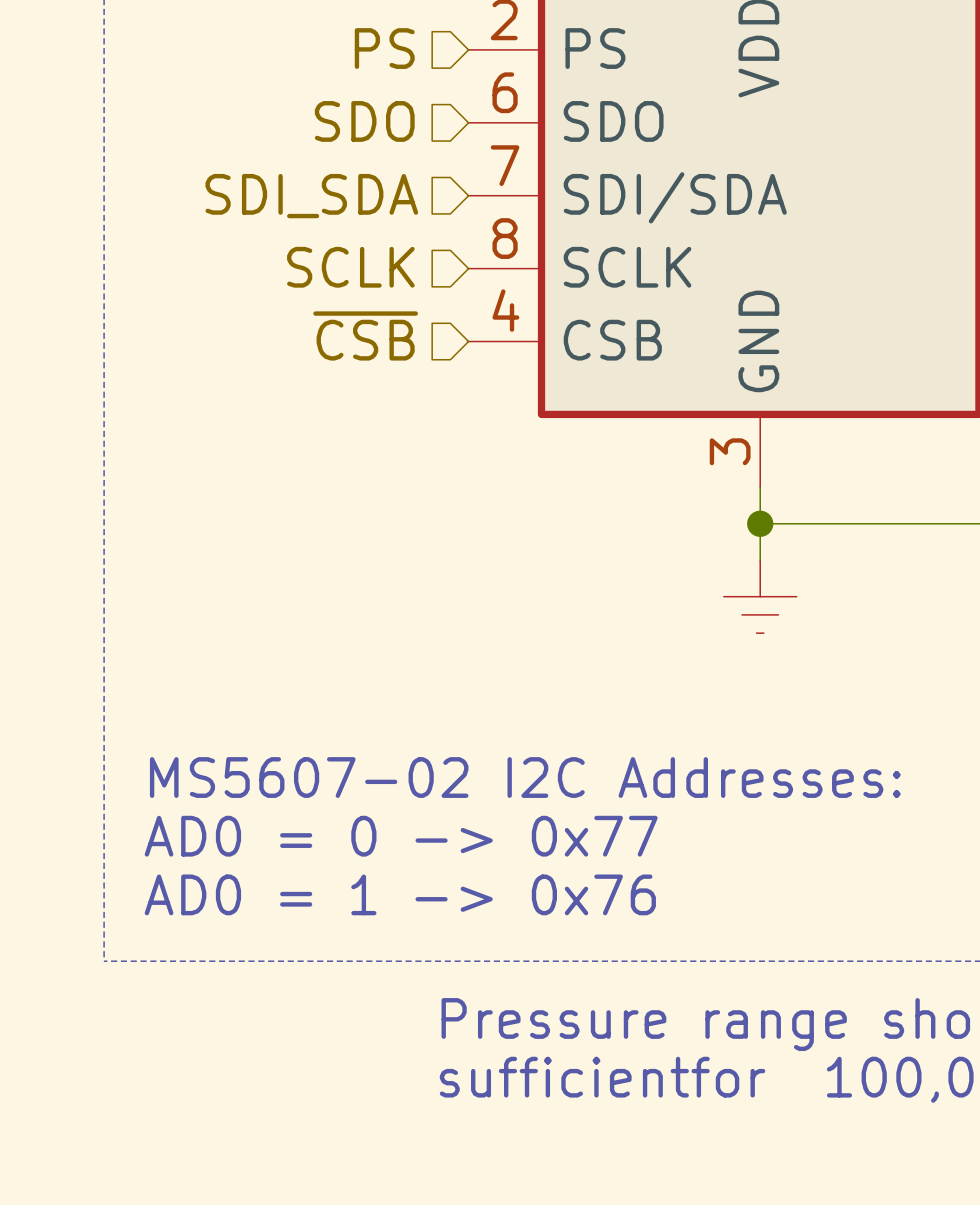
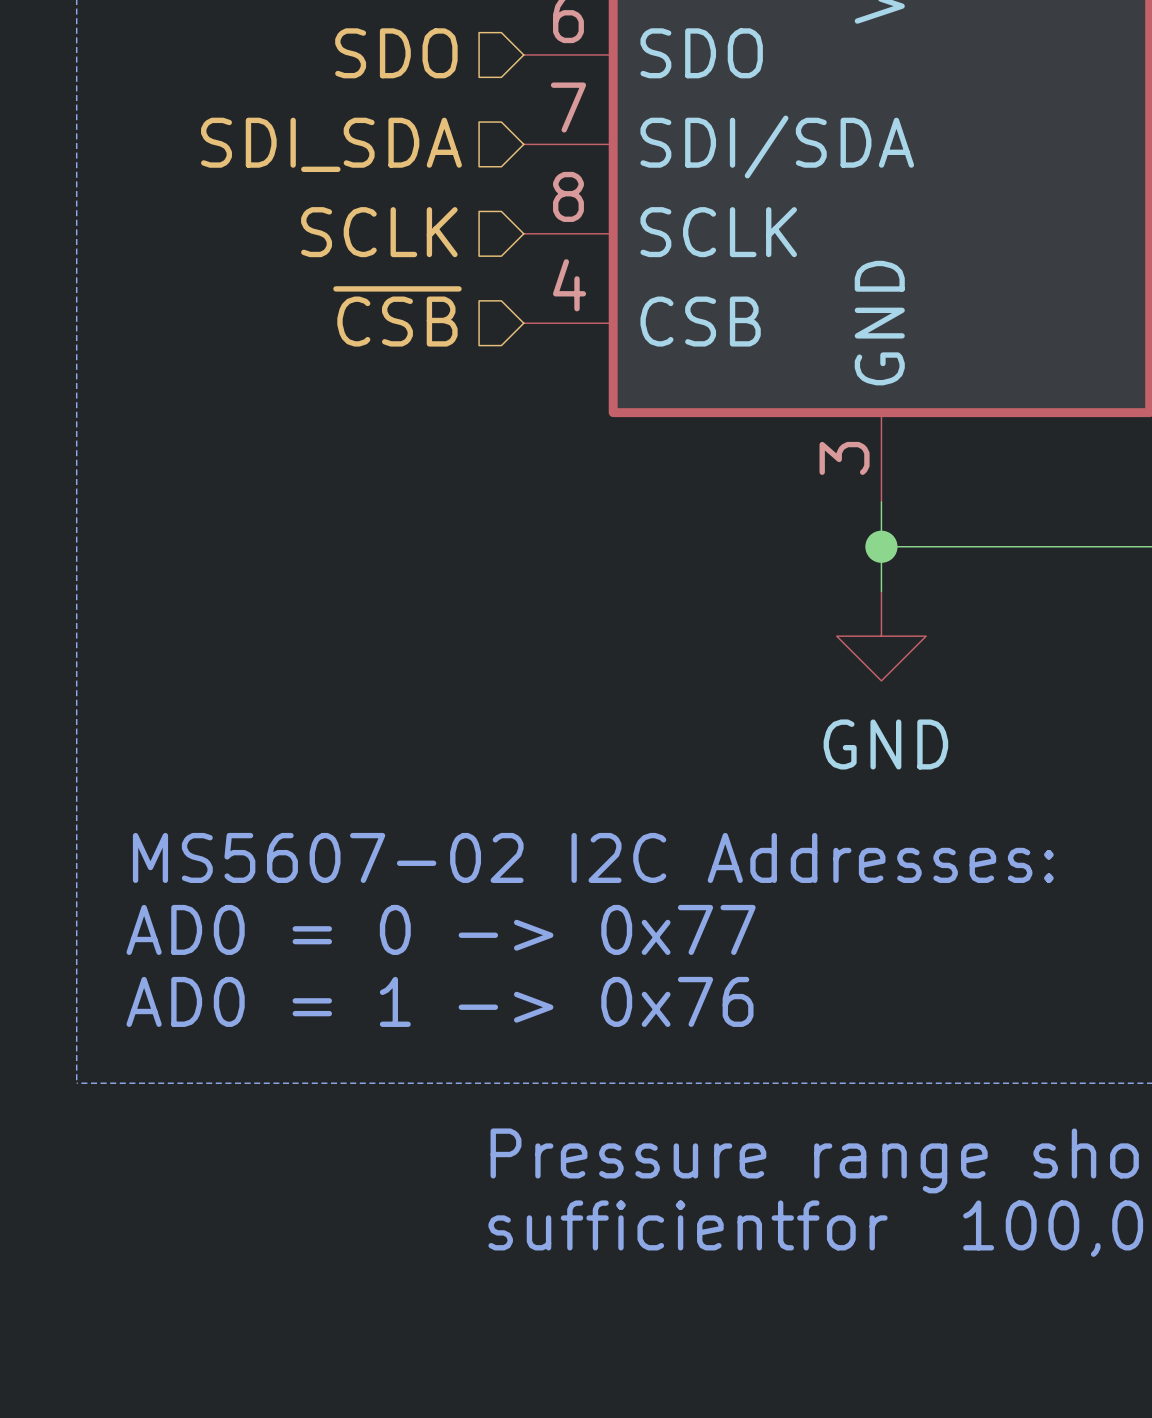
power symbol shape: [723, 560, 797, 634] -> [836, 591, 927, 681]
power symbol text: none -> GND (885, 744)

